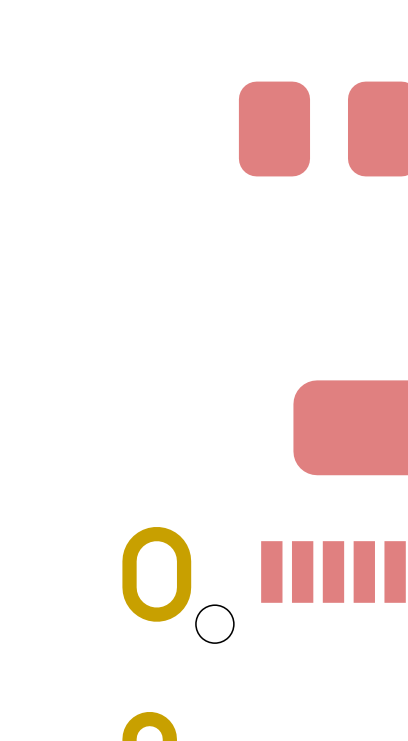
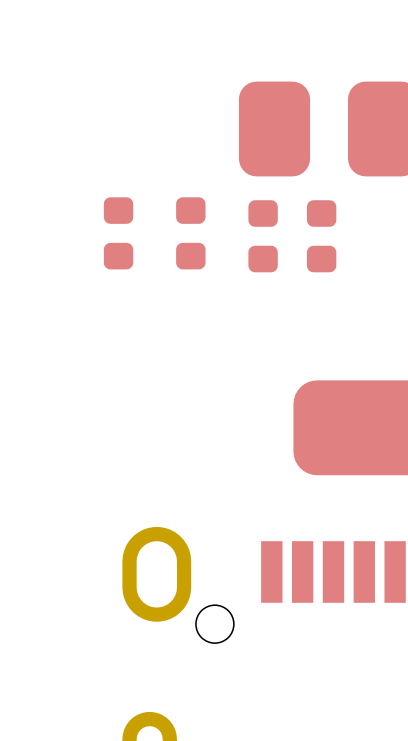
part: none -> (118, 233)
part: none -> (190, 233)
part: none -> (263, 236)
part: none -> (321, 236)

